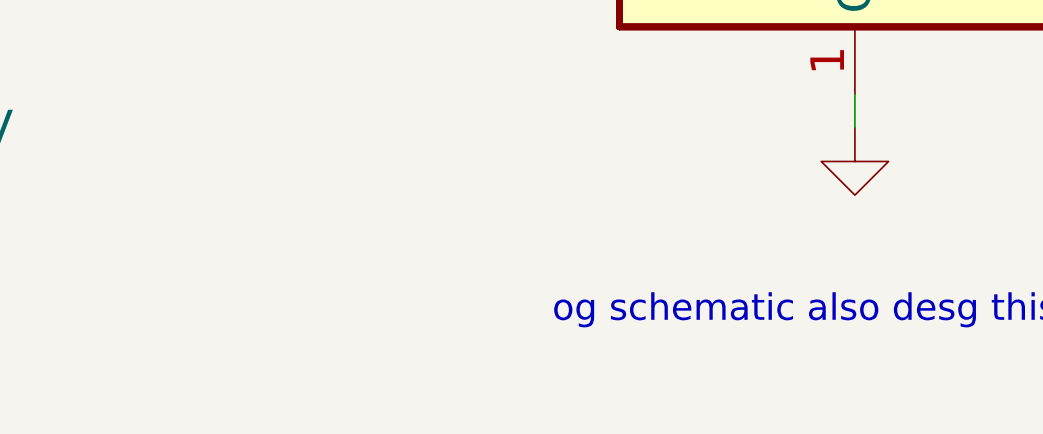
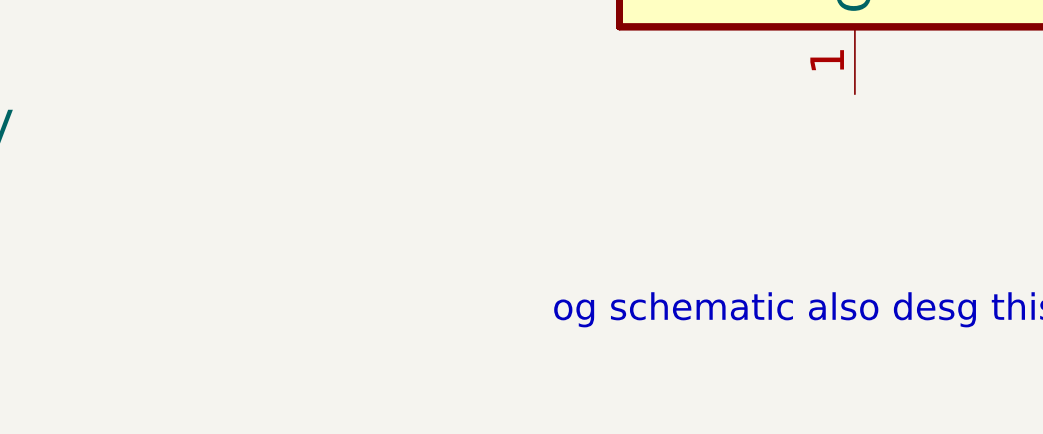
wire: (854, 94) (854, 127) -> none
power symbol: (854, 161) -> none

